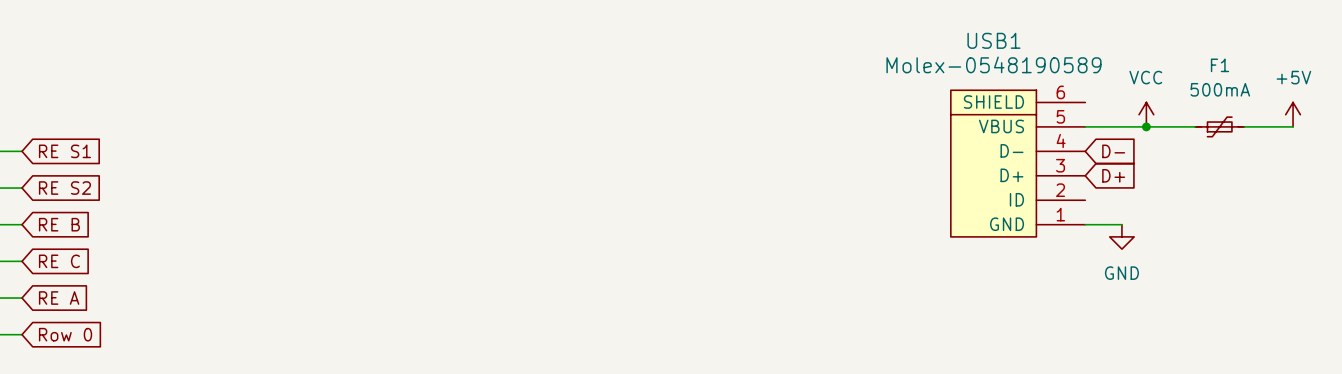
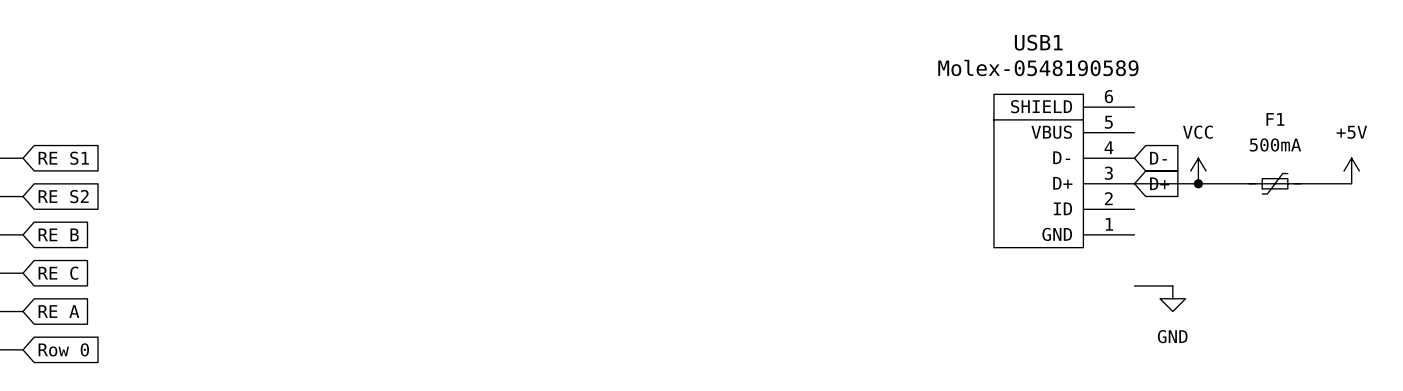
power symbol position: VCC (1146, 114) -> VCC (1198, 171)
power symbol position: +5V (1293, 114) -> +5V (1351, 171)
wire: (1085, 126) (1195, 126) -> (1134, 183) (1249, 183)
junction position: (1146, 126) -> (1198, 183)
F1 position: (1219, 126) -> (1275, 183)
wire: (1244, 126) (1293, 126) -> (1300, 183) (1351, 183)
wire: (1085, 224) (1121, 224) -> (1134, 285) (1172, 285)
power symbol position: GND (1121, 236) -> GND (1172, 298)

